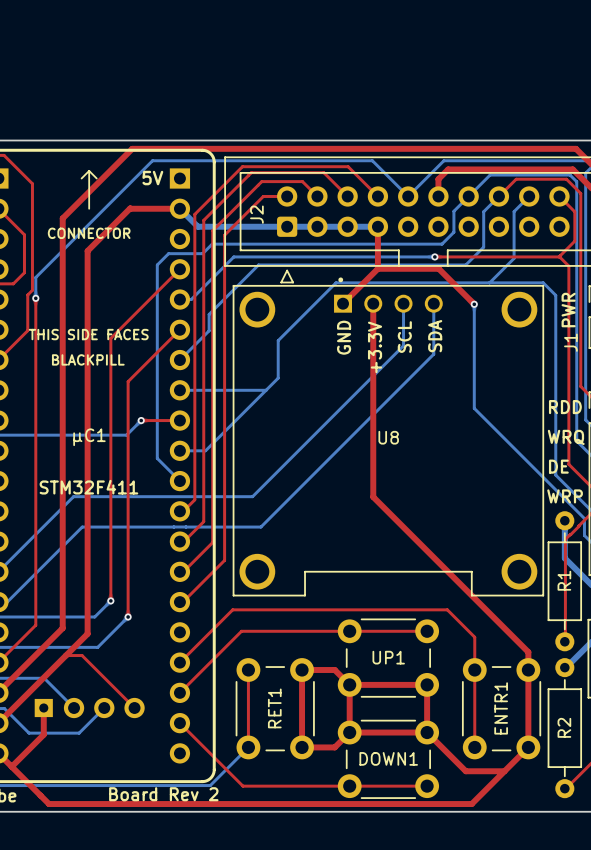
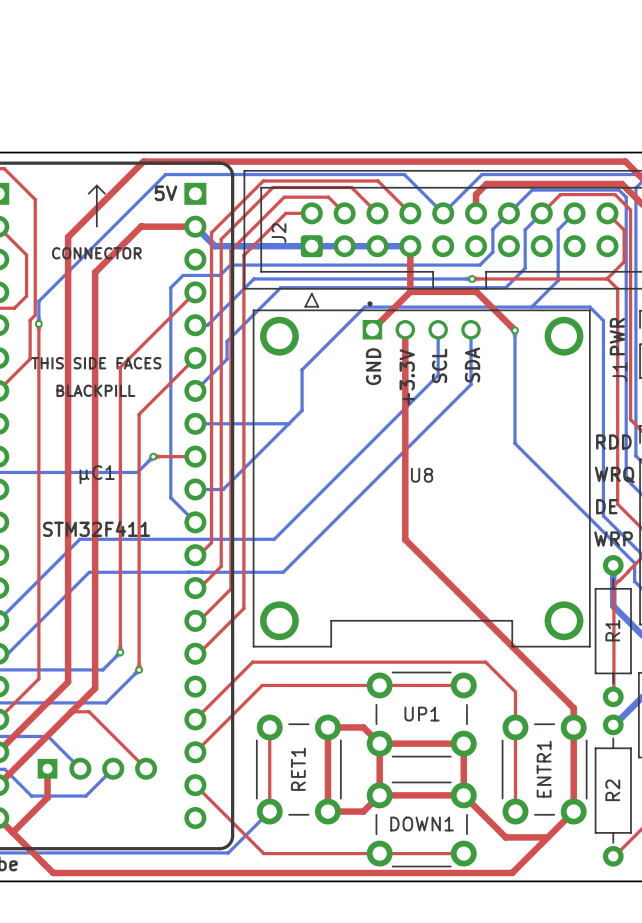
text: Board Rev 2 (163, 794) -> none

